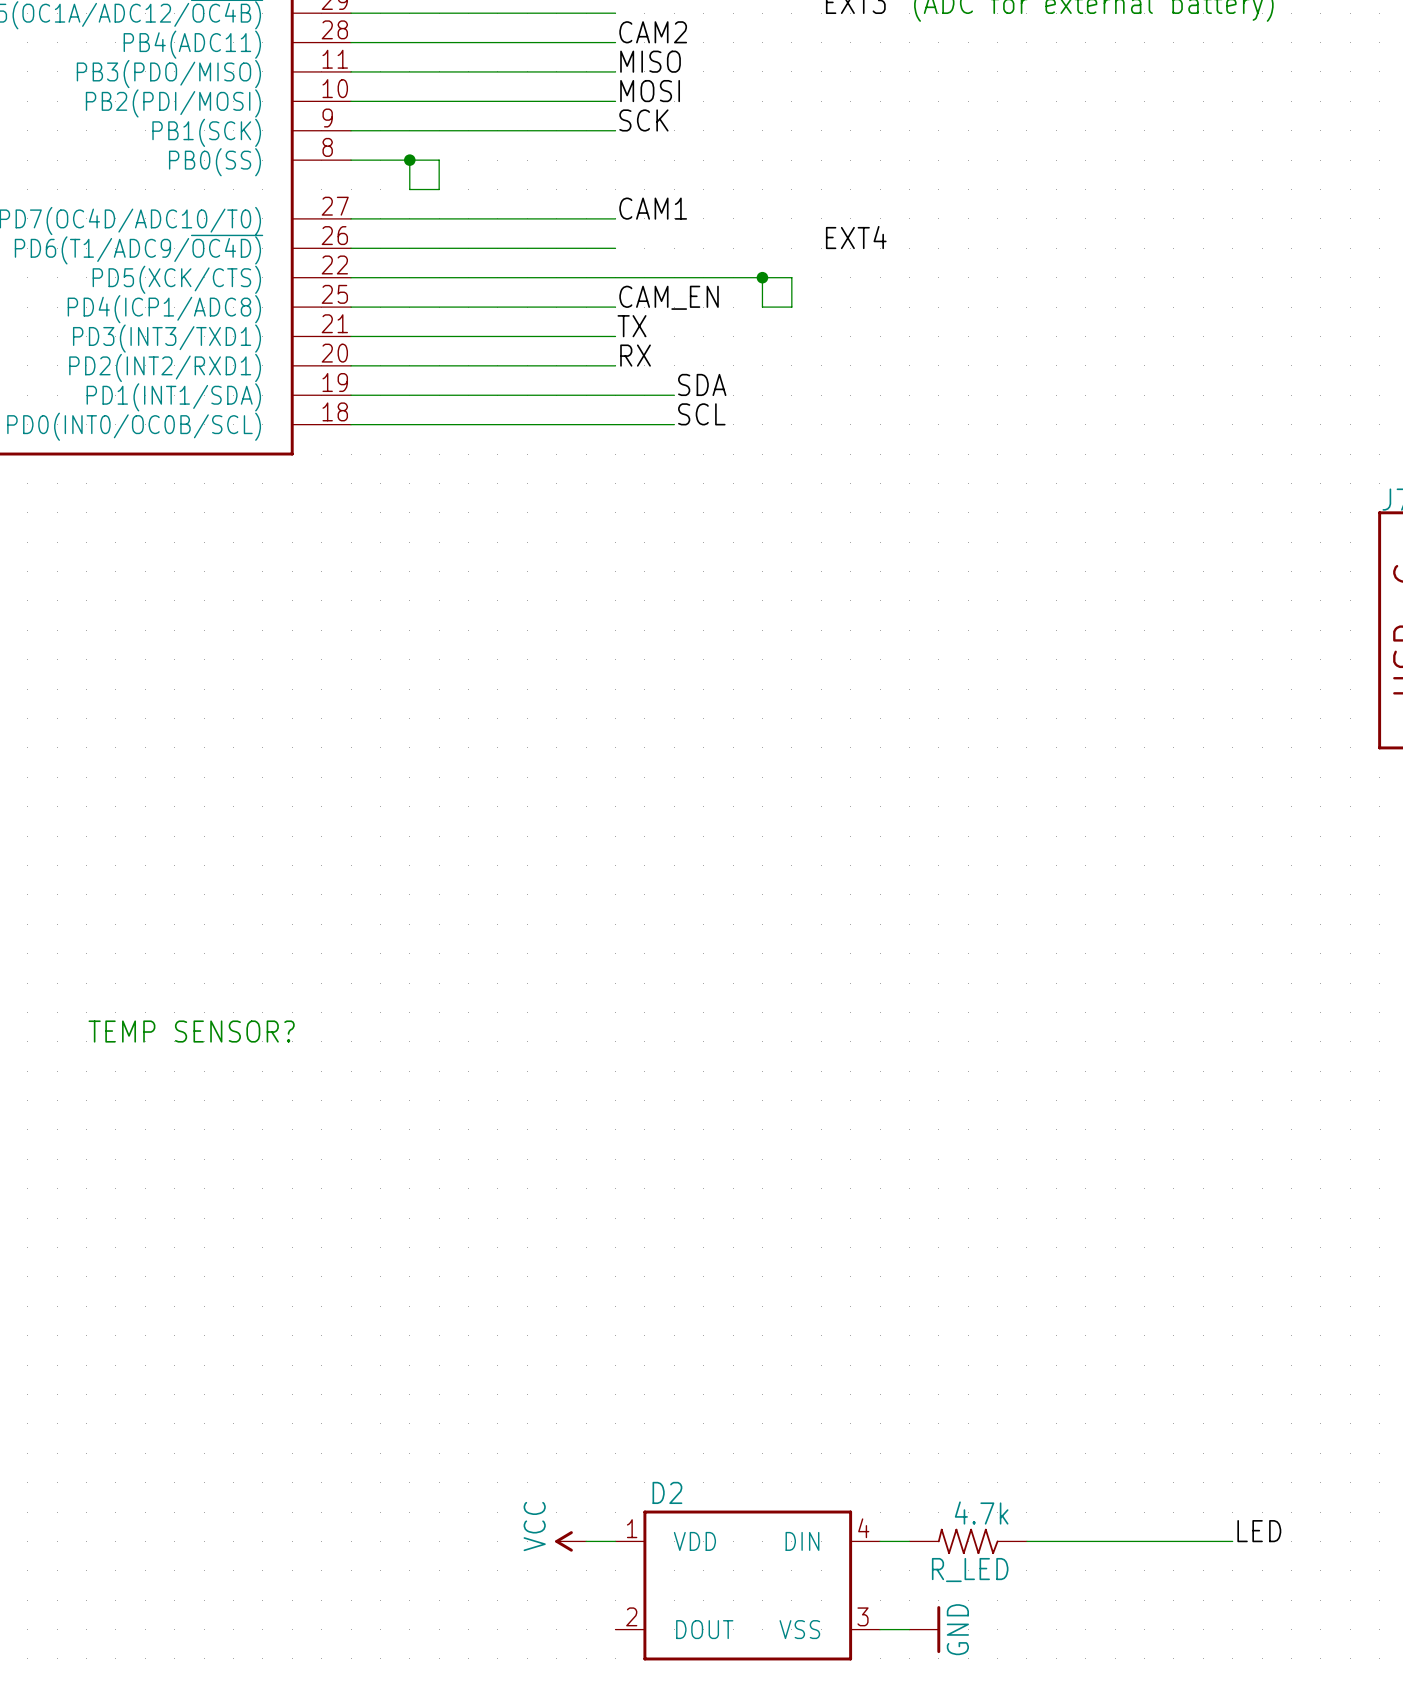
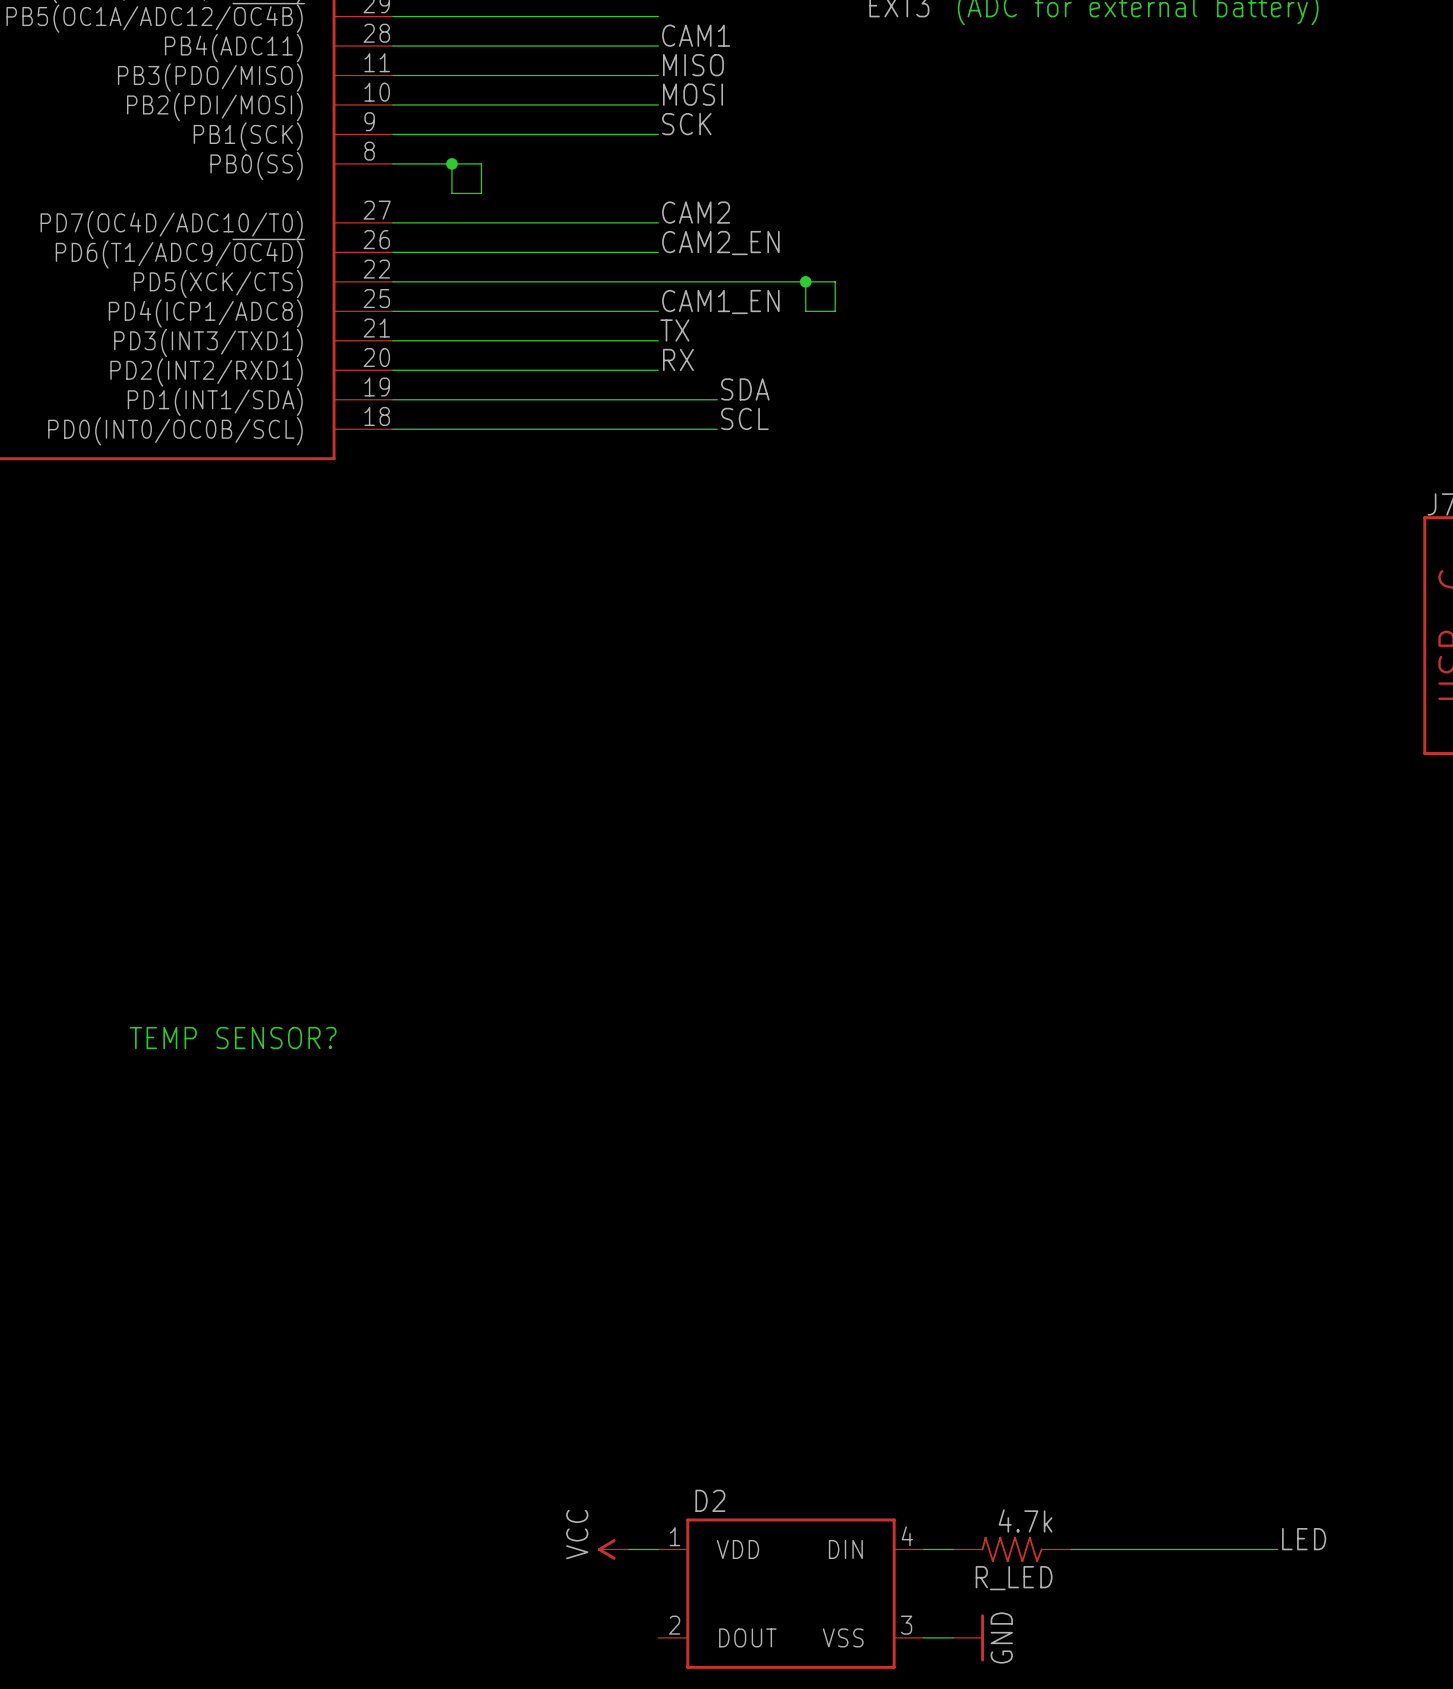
label: CAM2 (653, 32) -> CAM1 (696, 35)
label: CAM1 (653, 208) -> CAM2 (696, 212)
label: EXT4 (856, 237) -> none
label: none -> CAM2_EN (720, 243)
label: CAM_EN (669, 297) -> CAM1_EN (720, 301)

